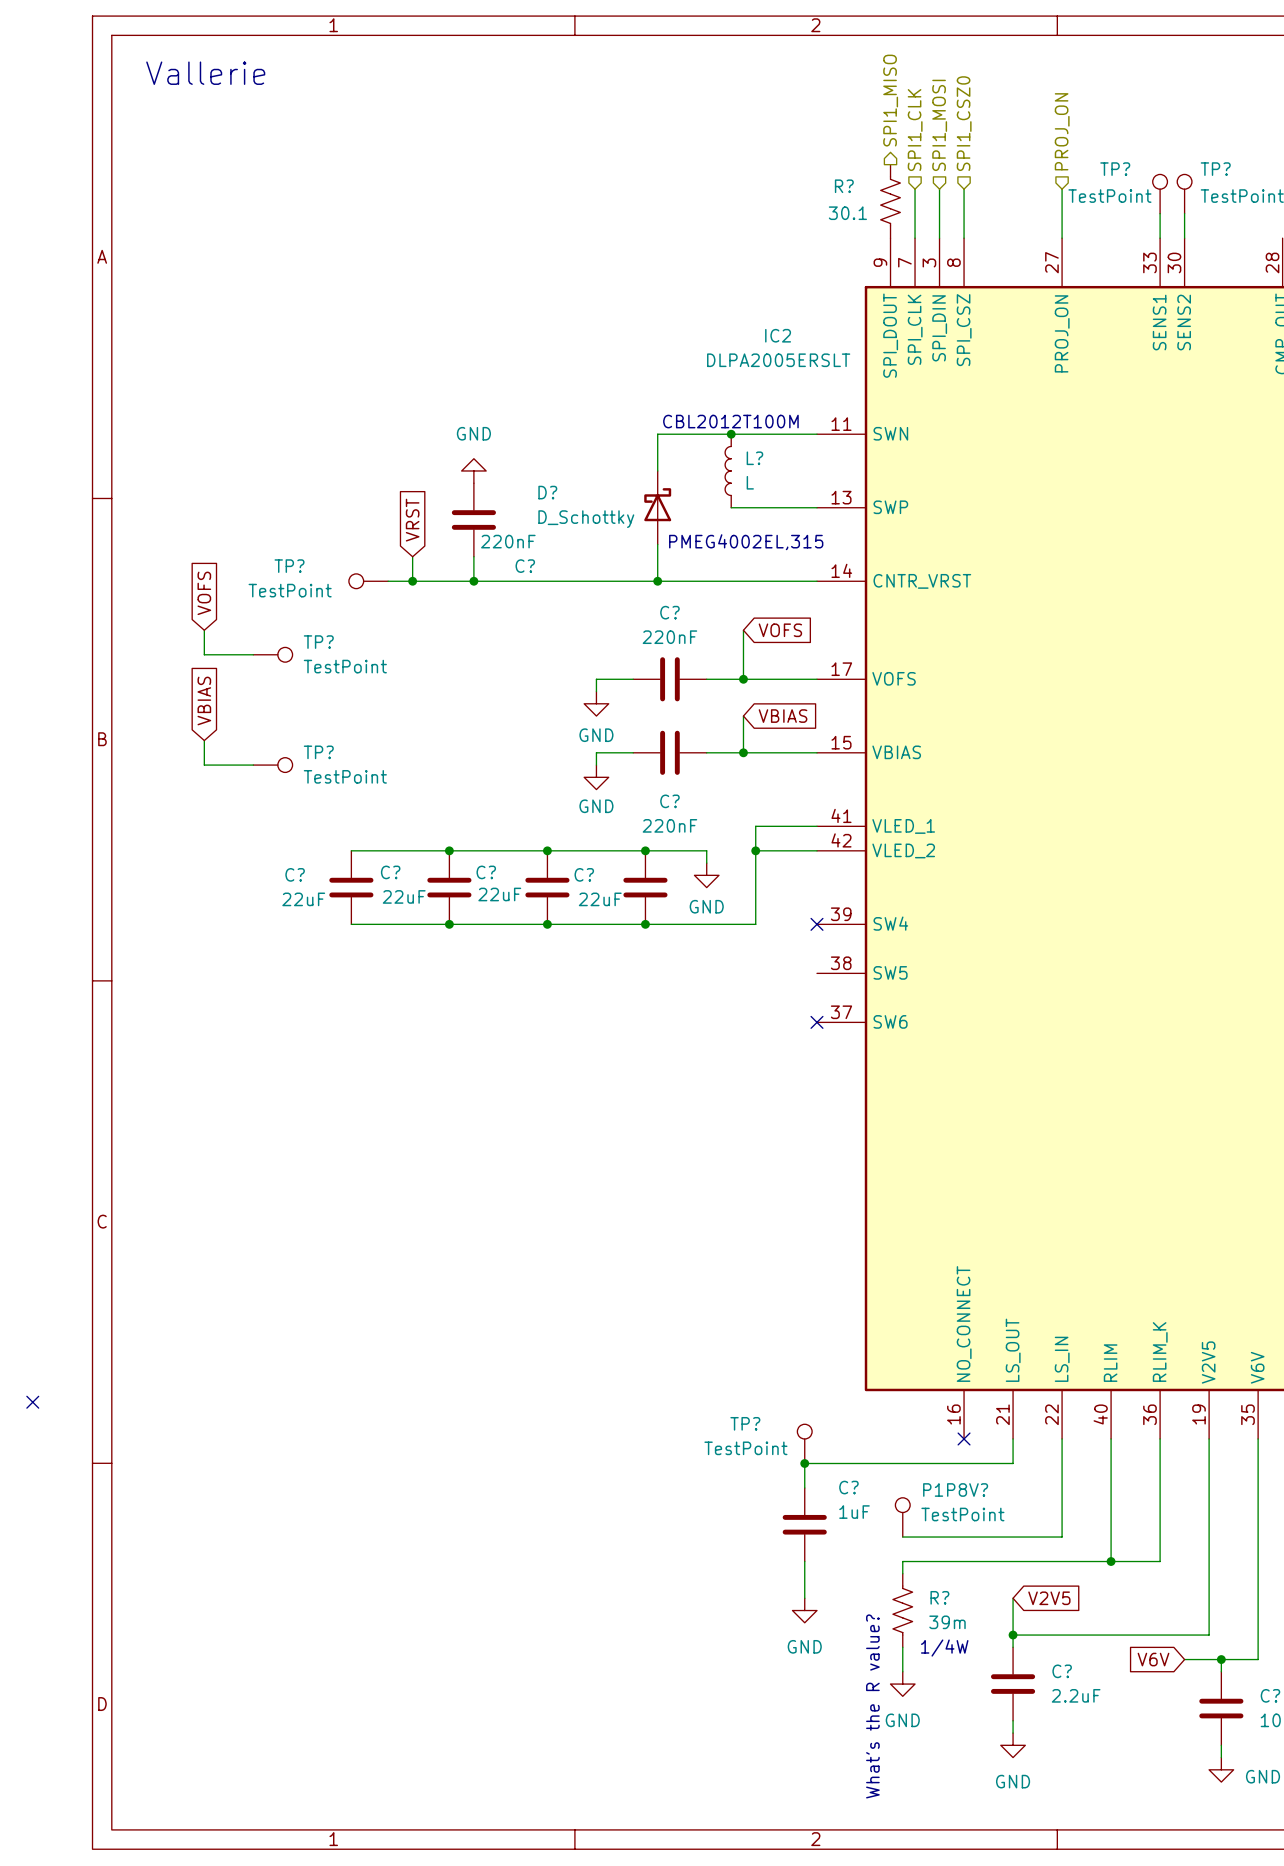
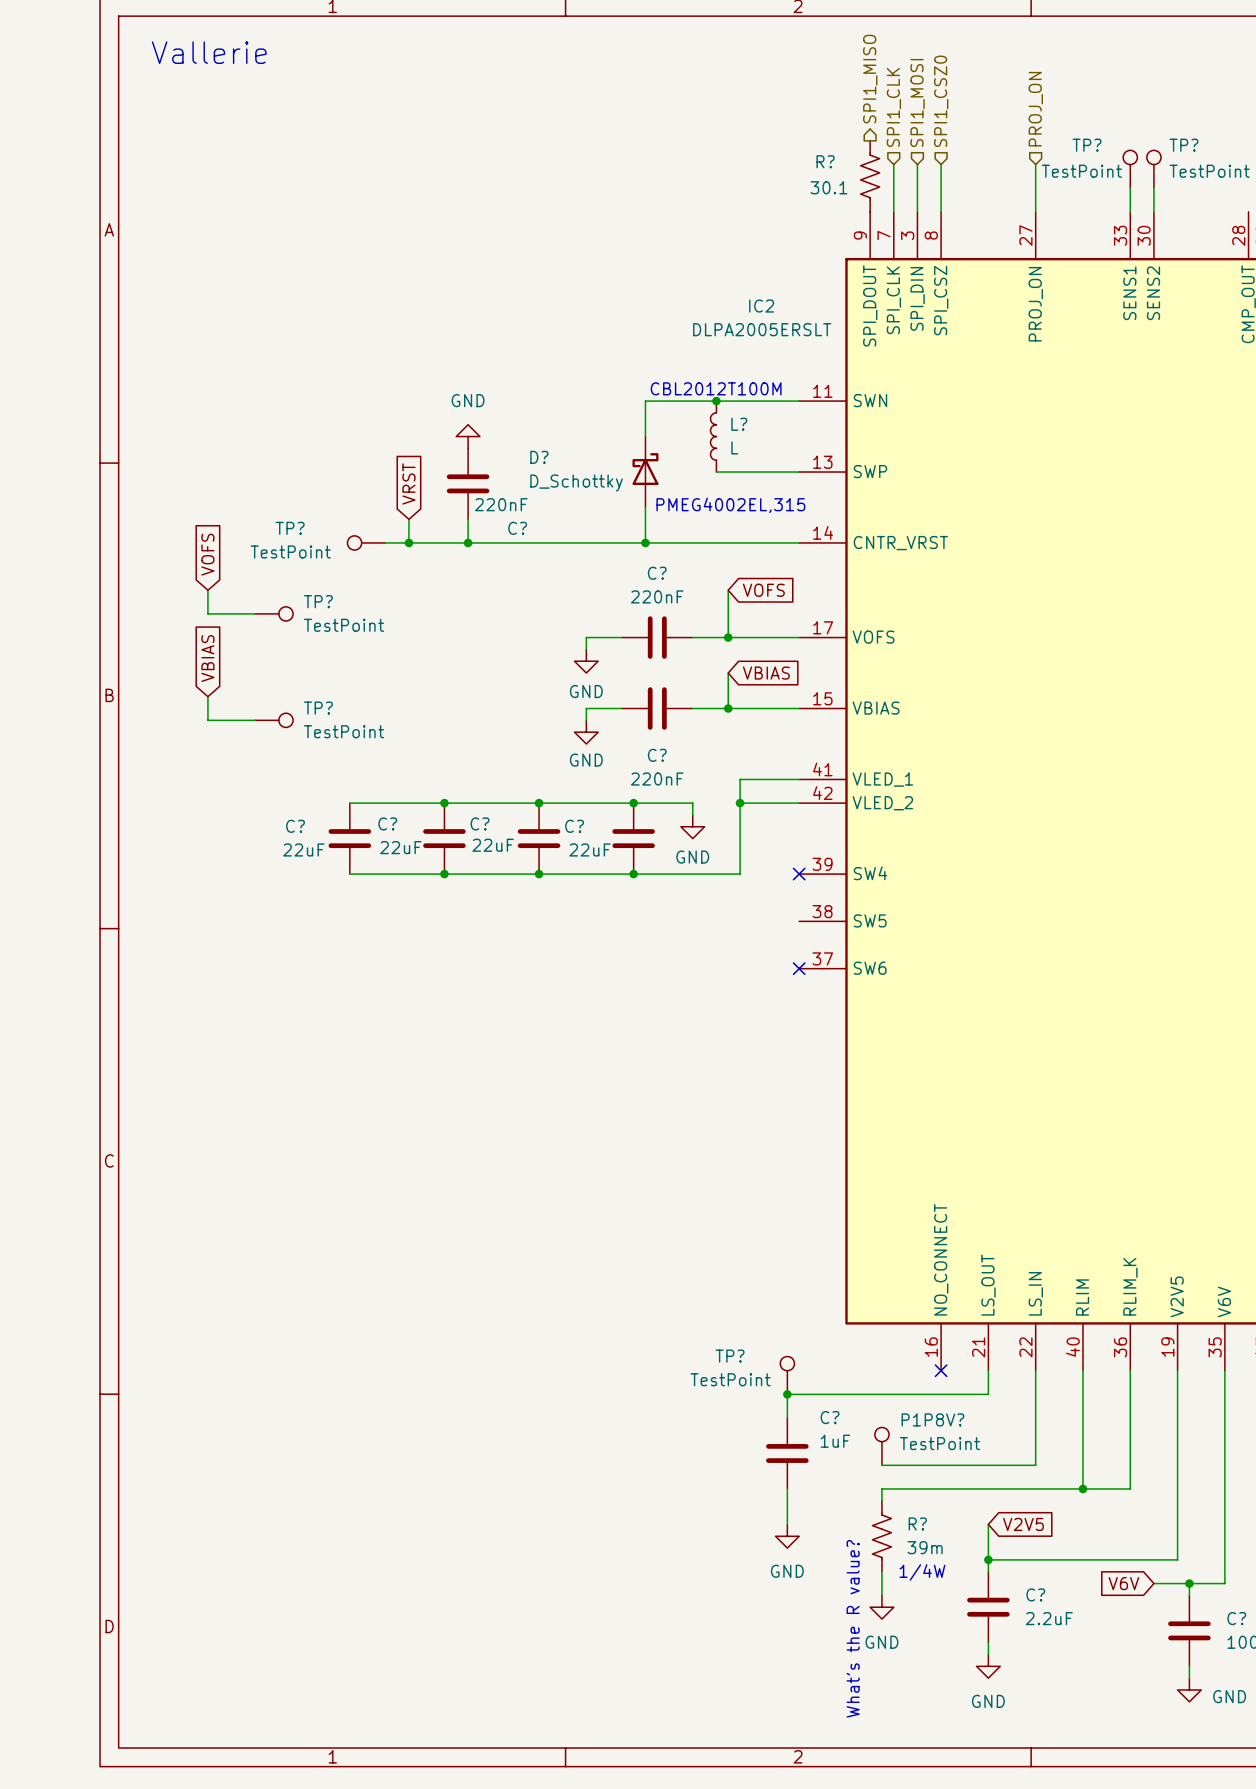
no-connect mark: (32, 1402) -> none

